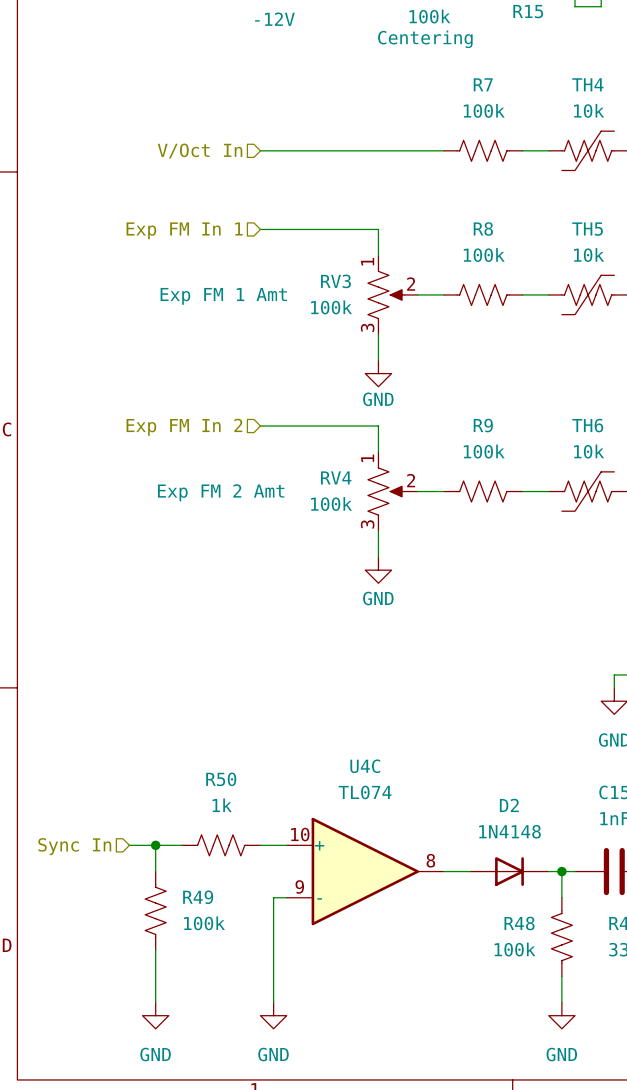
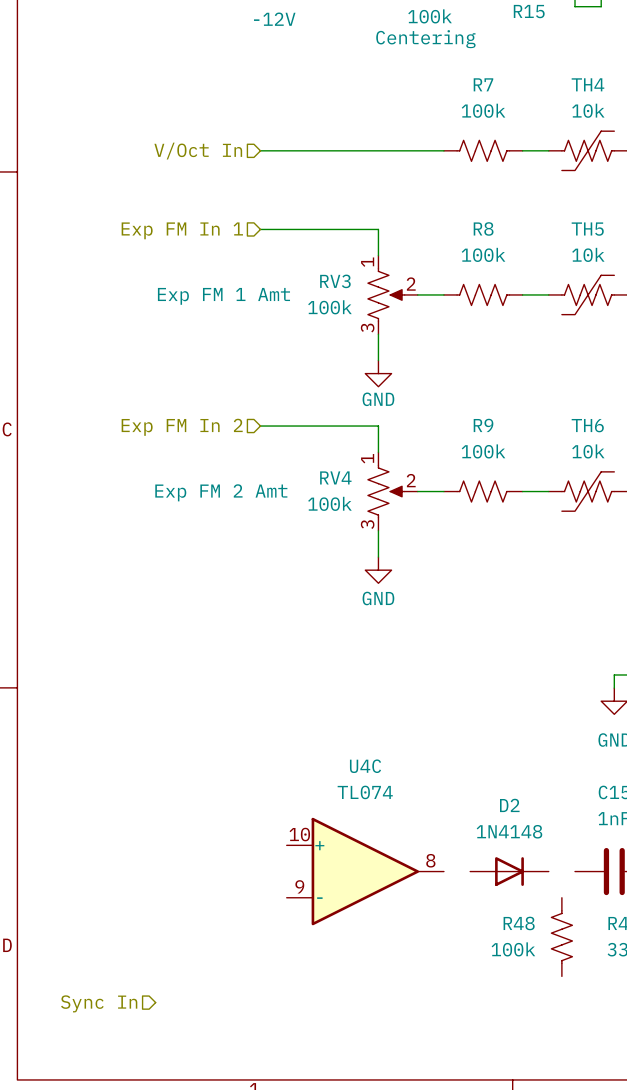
wire: (129, 845) (181, 845) -> none
wire: (155, 845) (155, 871) -> none
junction: (155, 845) -> none
R50: 1k (221, 845) -> none
wire: (260, 845) (286, 845) -> none
hierarchical label position: Sync In (74, 846) -> Sync In (99, 1003)
wire: (443, 871) (470, 871) -> none
wire: (548, 871) (575, 871) -> none
wire: (561, 871) (561, 897) -> none
junction: (561, 871) -> none
wire: (286, 897) (273, 897) (273, 1002) -> none
R49: 100k (155, 910) -> none
wire: (155, 950) (155, 1002) -> none
wire: (561, 976) (561, 1002) -> none
power symbol: GND (155, 1015) -> none
power symbol: GND (273, 1015) -> none
power symbol: GND (561, 1015) -> none

